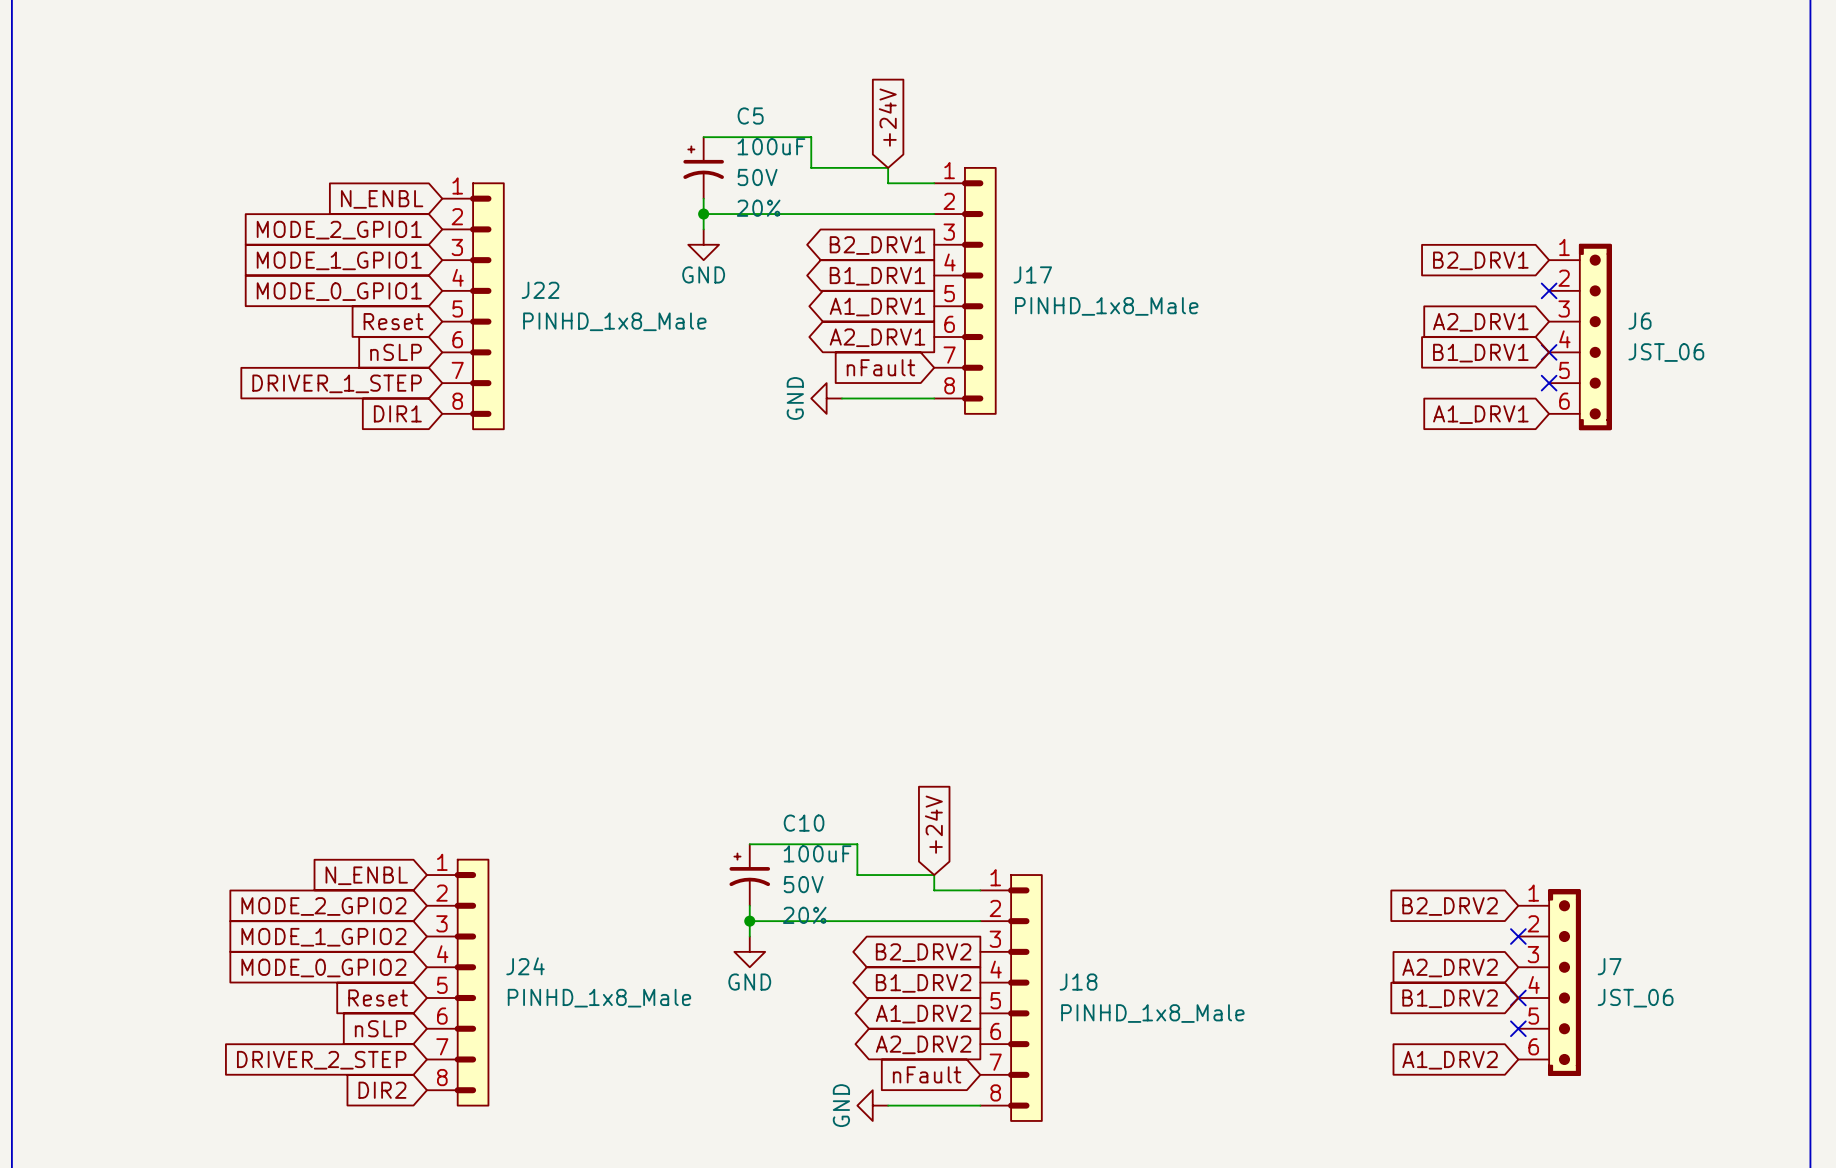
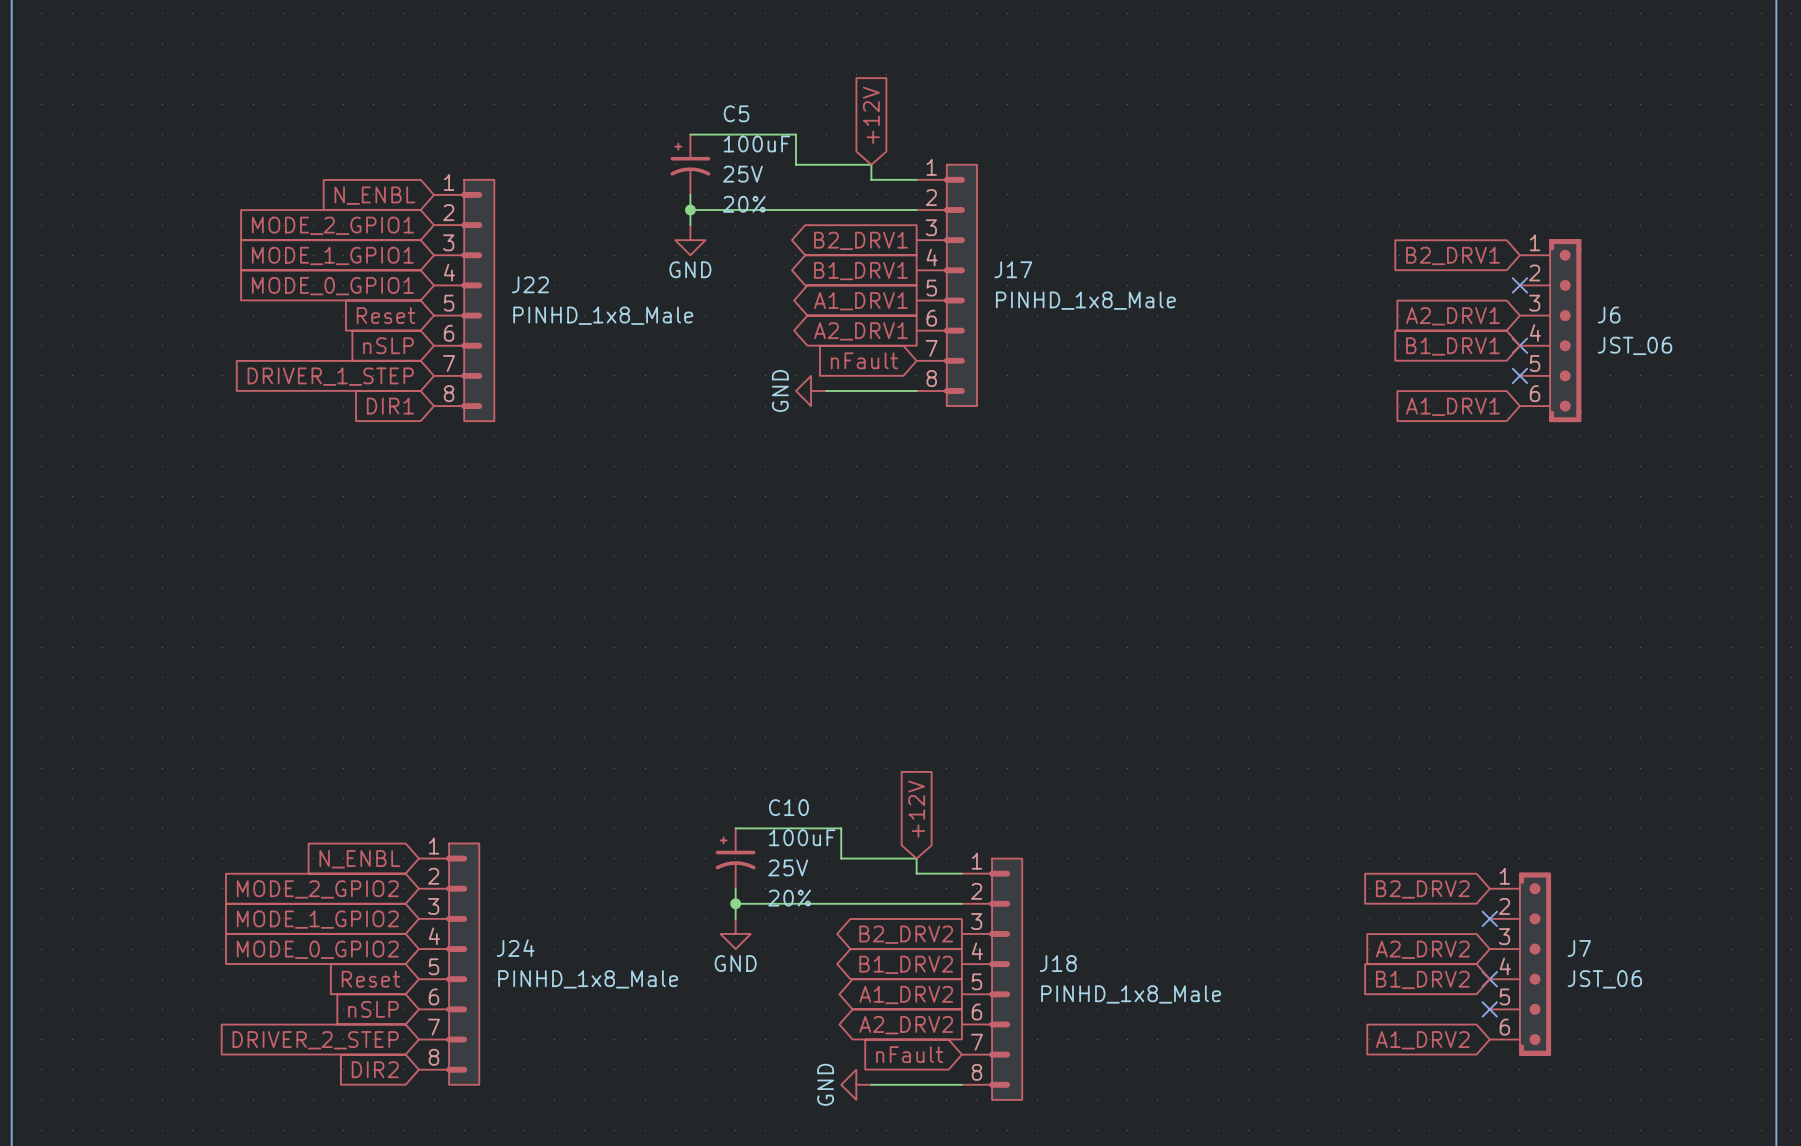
global label: +24V (887, 117) -> +12V (871, 115)
C5 text: 50V (757, 177) -> 25V (742, 174)
global label: +24V (933, 824) -> +12V (916, 809)
C10 text: 50V (803, 884) -> 25V (788, 867)

